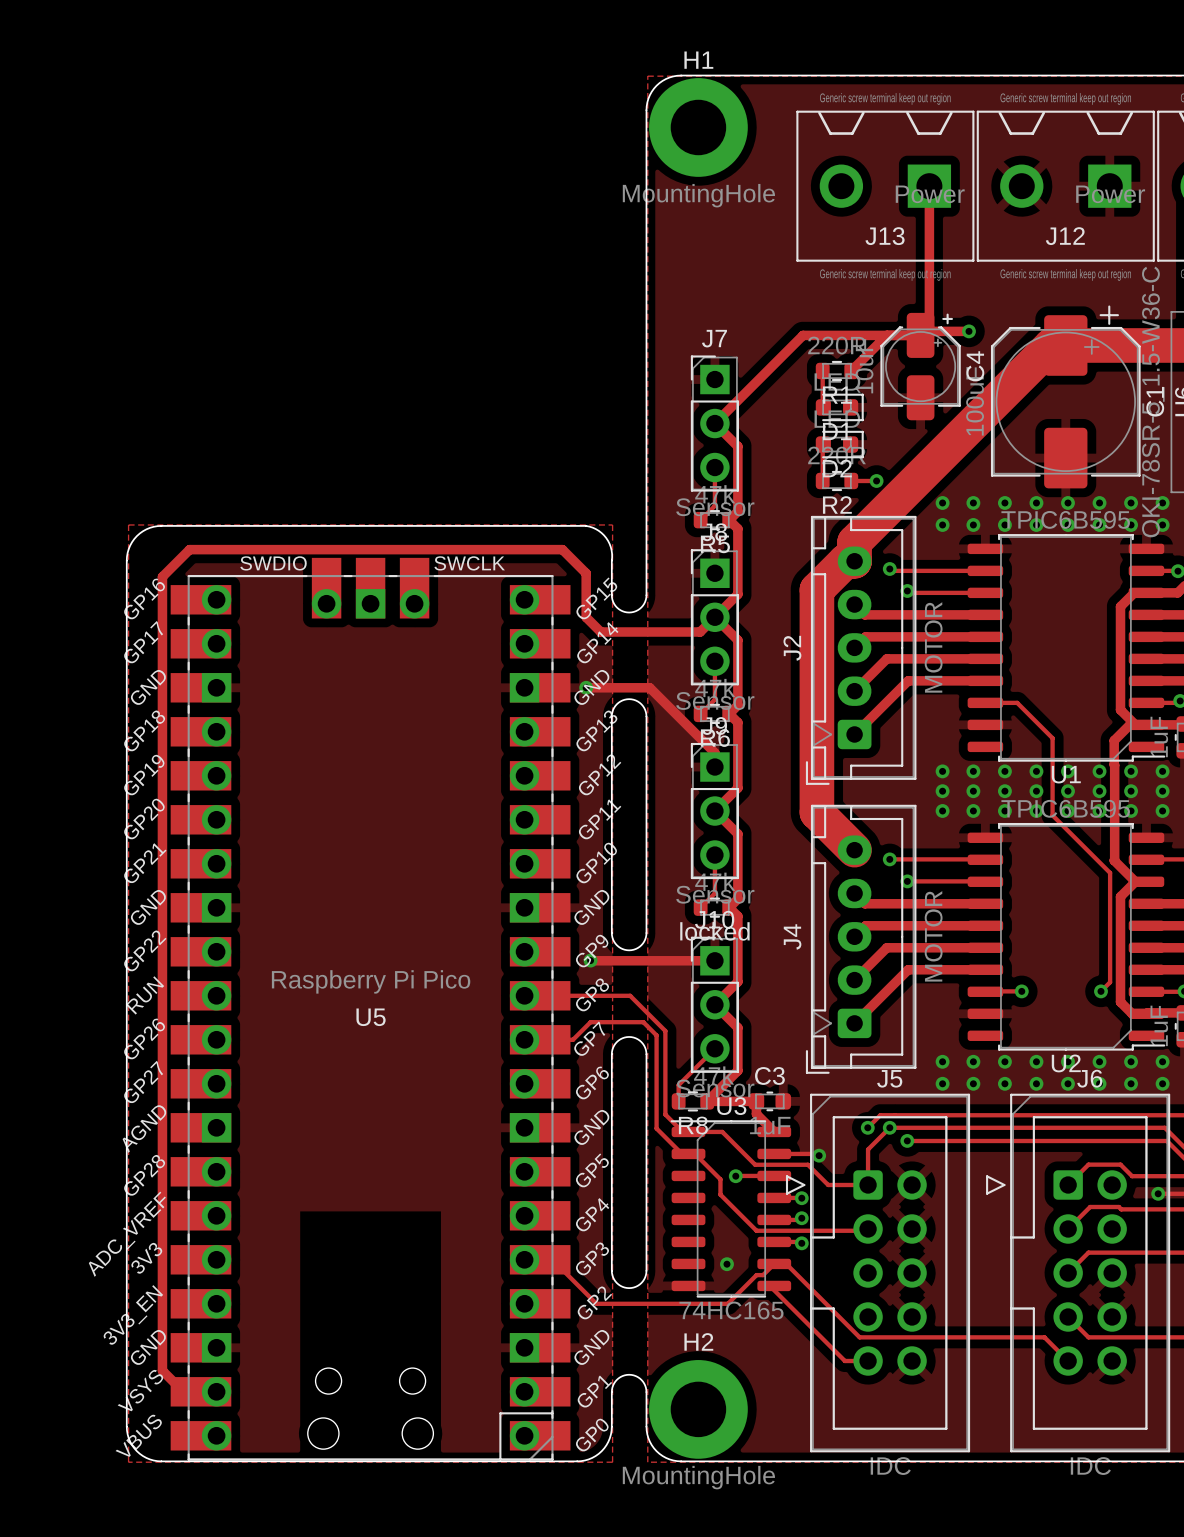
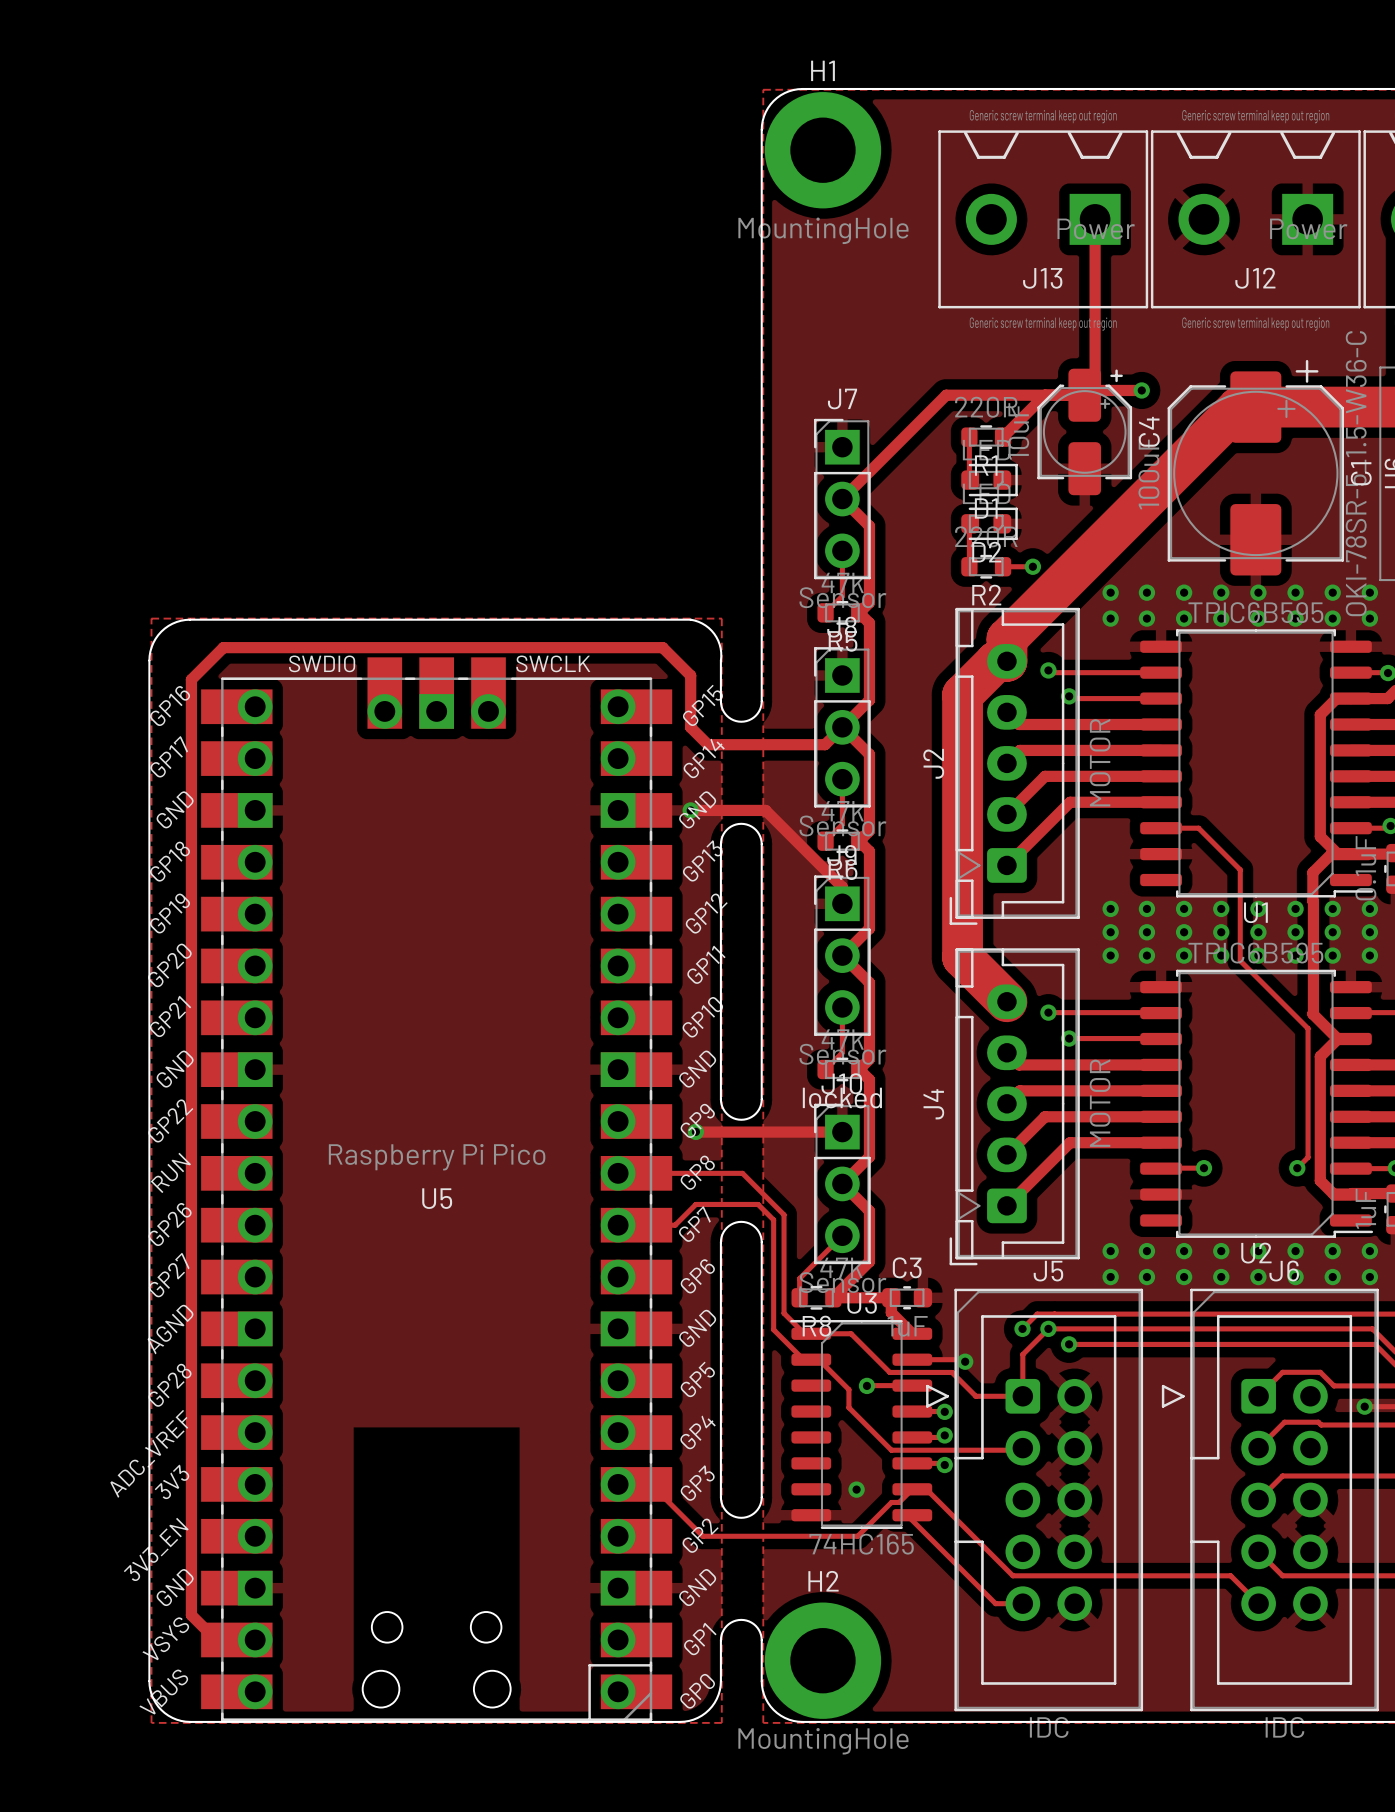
part value: 1uF (1159, 736) -> 0.1uF (1365, 868)

